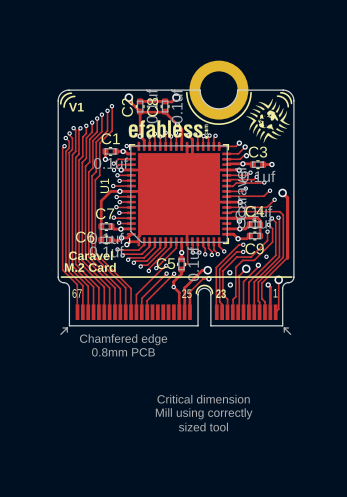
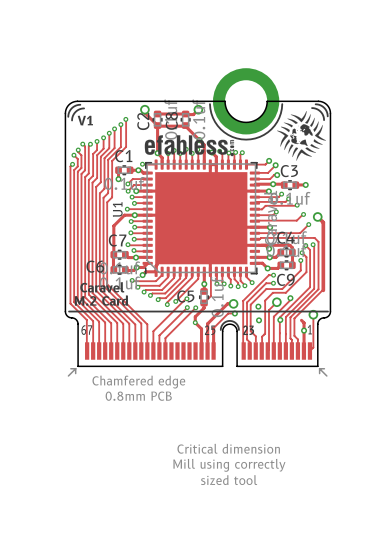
via: (266, 256) -> none
via: none -> (280, 320)
via: (268, 284) -> none
via: none -> (304, 330)

